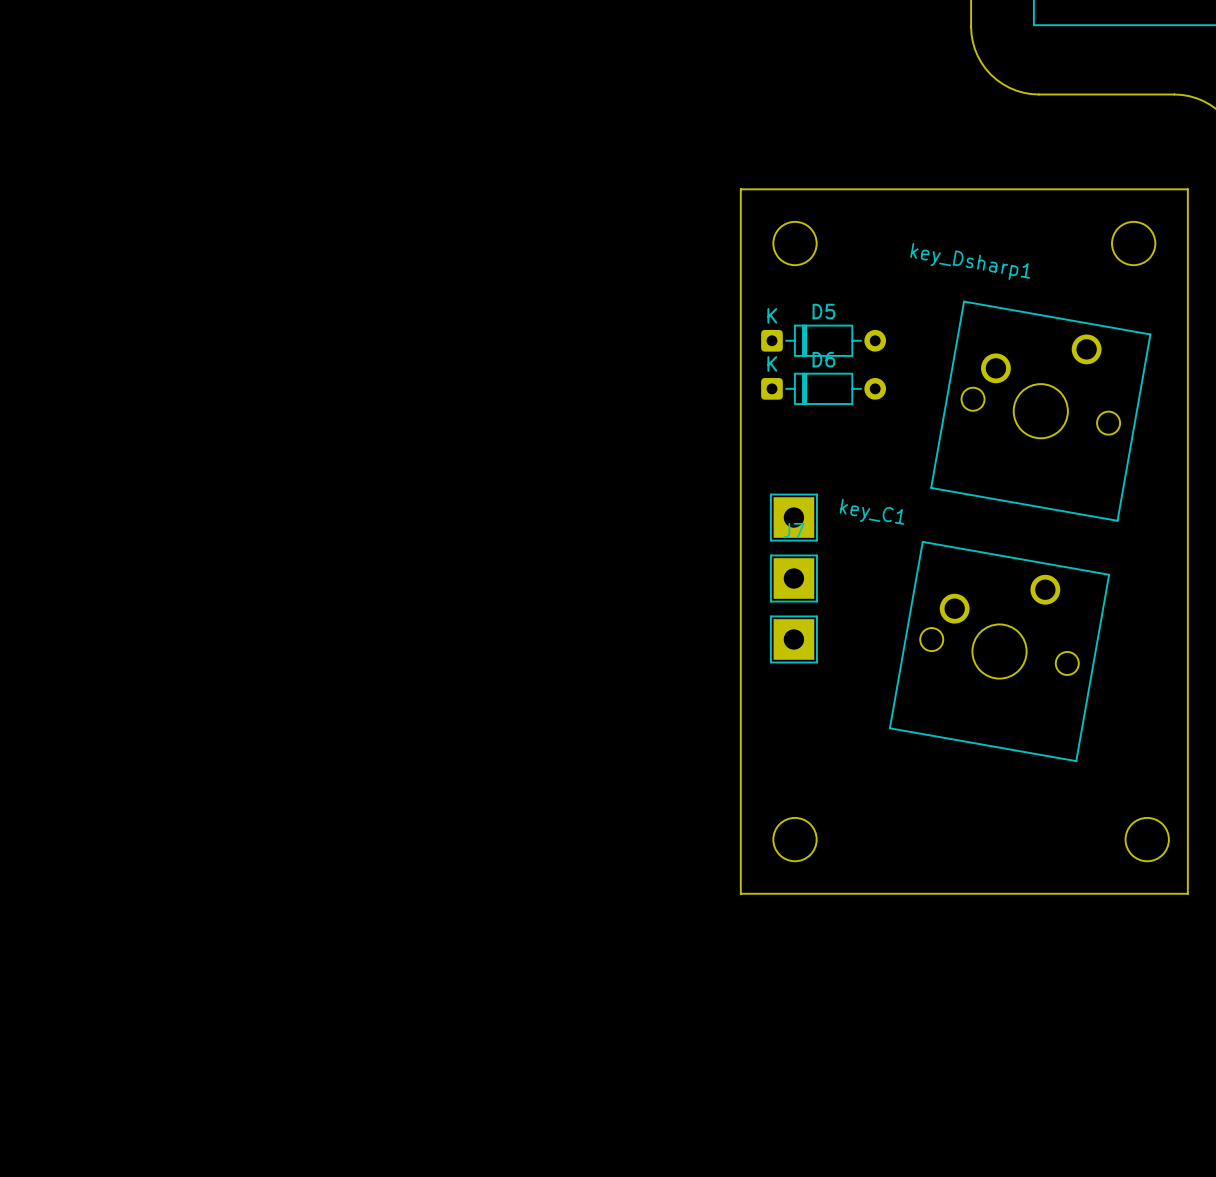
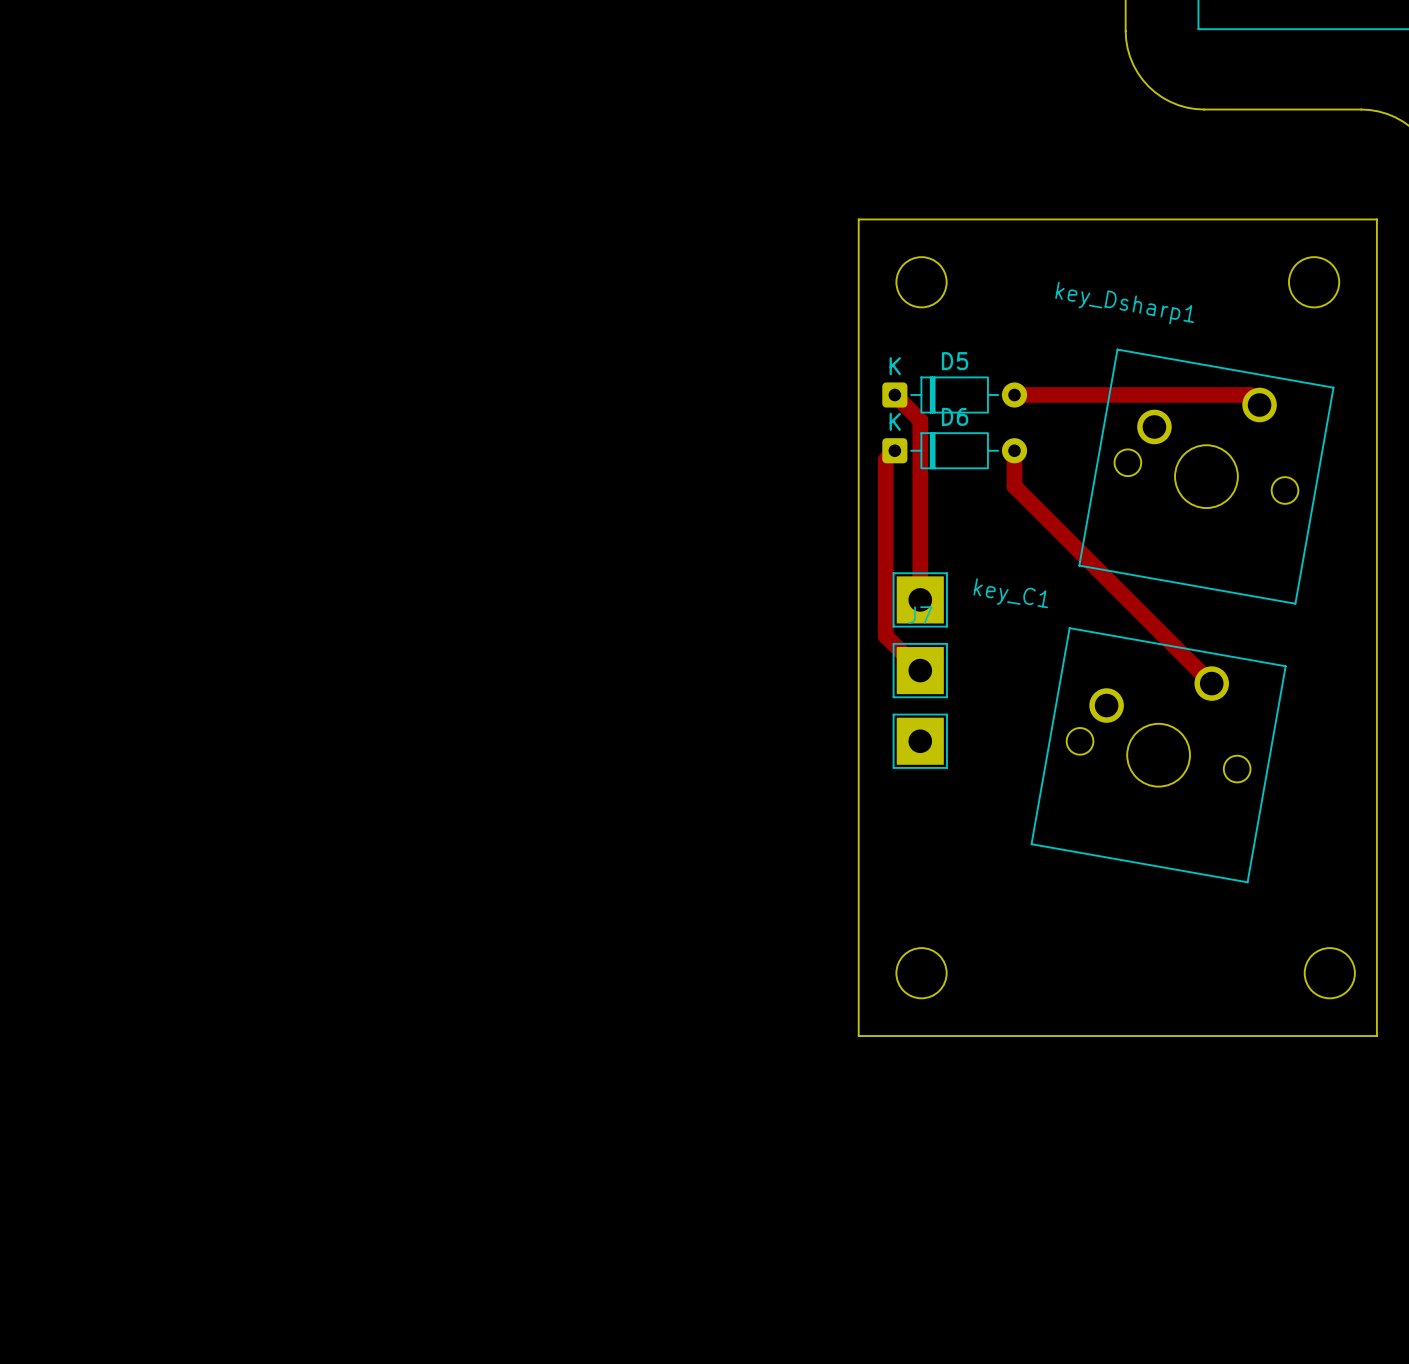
track: none -> (894, 394) (920, 420) (920, 599)
track: none -> (1014, 394) (1249, 394) (1259, 404)
track: none -> (894, 450) (885, 459) (885, 636) (920, 670)
track: none -> (1014, 450) (1014, 486) (1211, 683)

